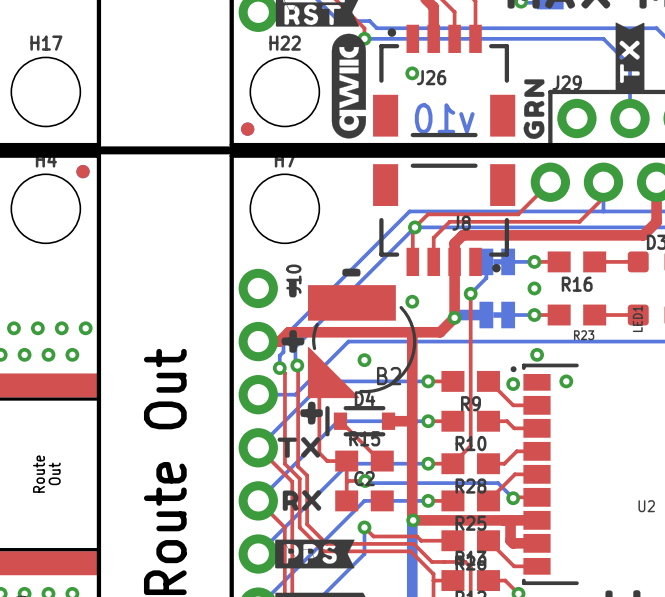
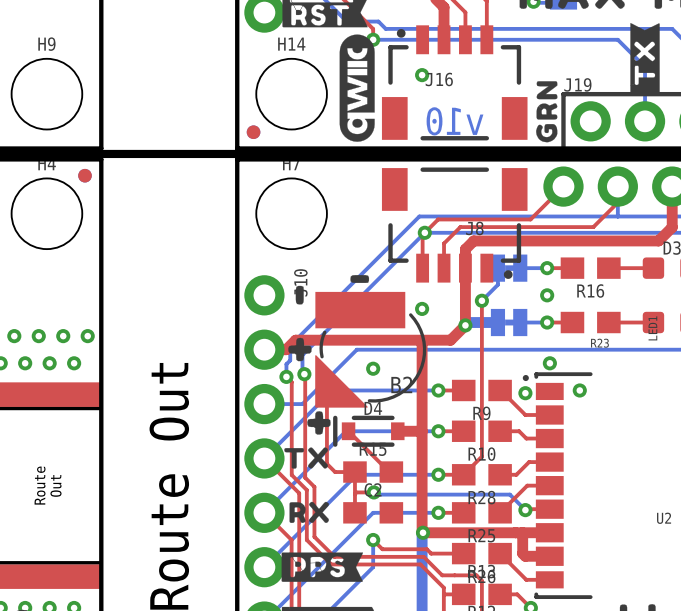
H17 name: H17 (46, 43) -> H9 (46, 44)
H22 name: H22 (285, 43) -> H14 (291, 44)
J26 name: J26 (431, 77) -> J16 (439, 79)
J29 name: J29 (567, 82) -> J19 (577, 84)

